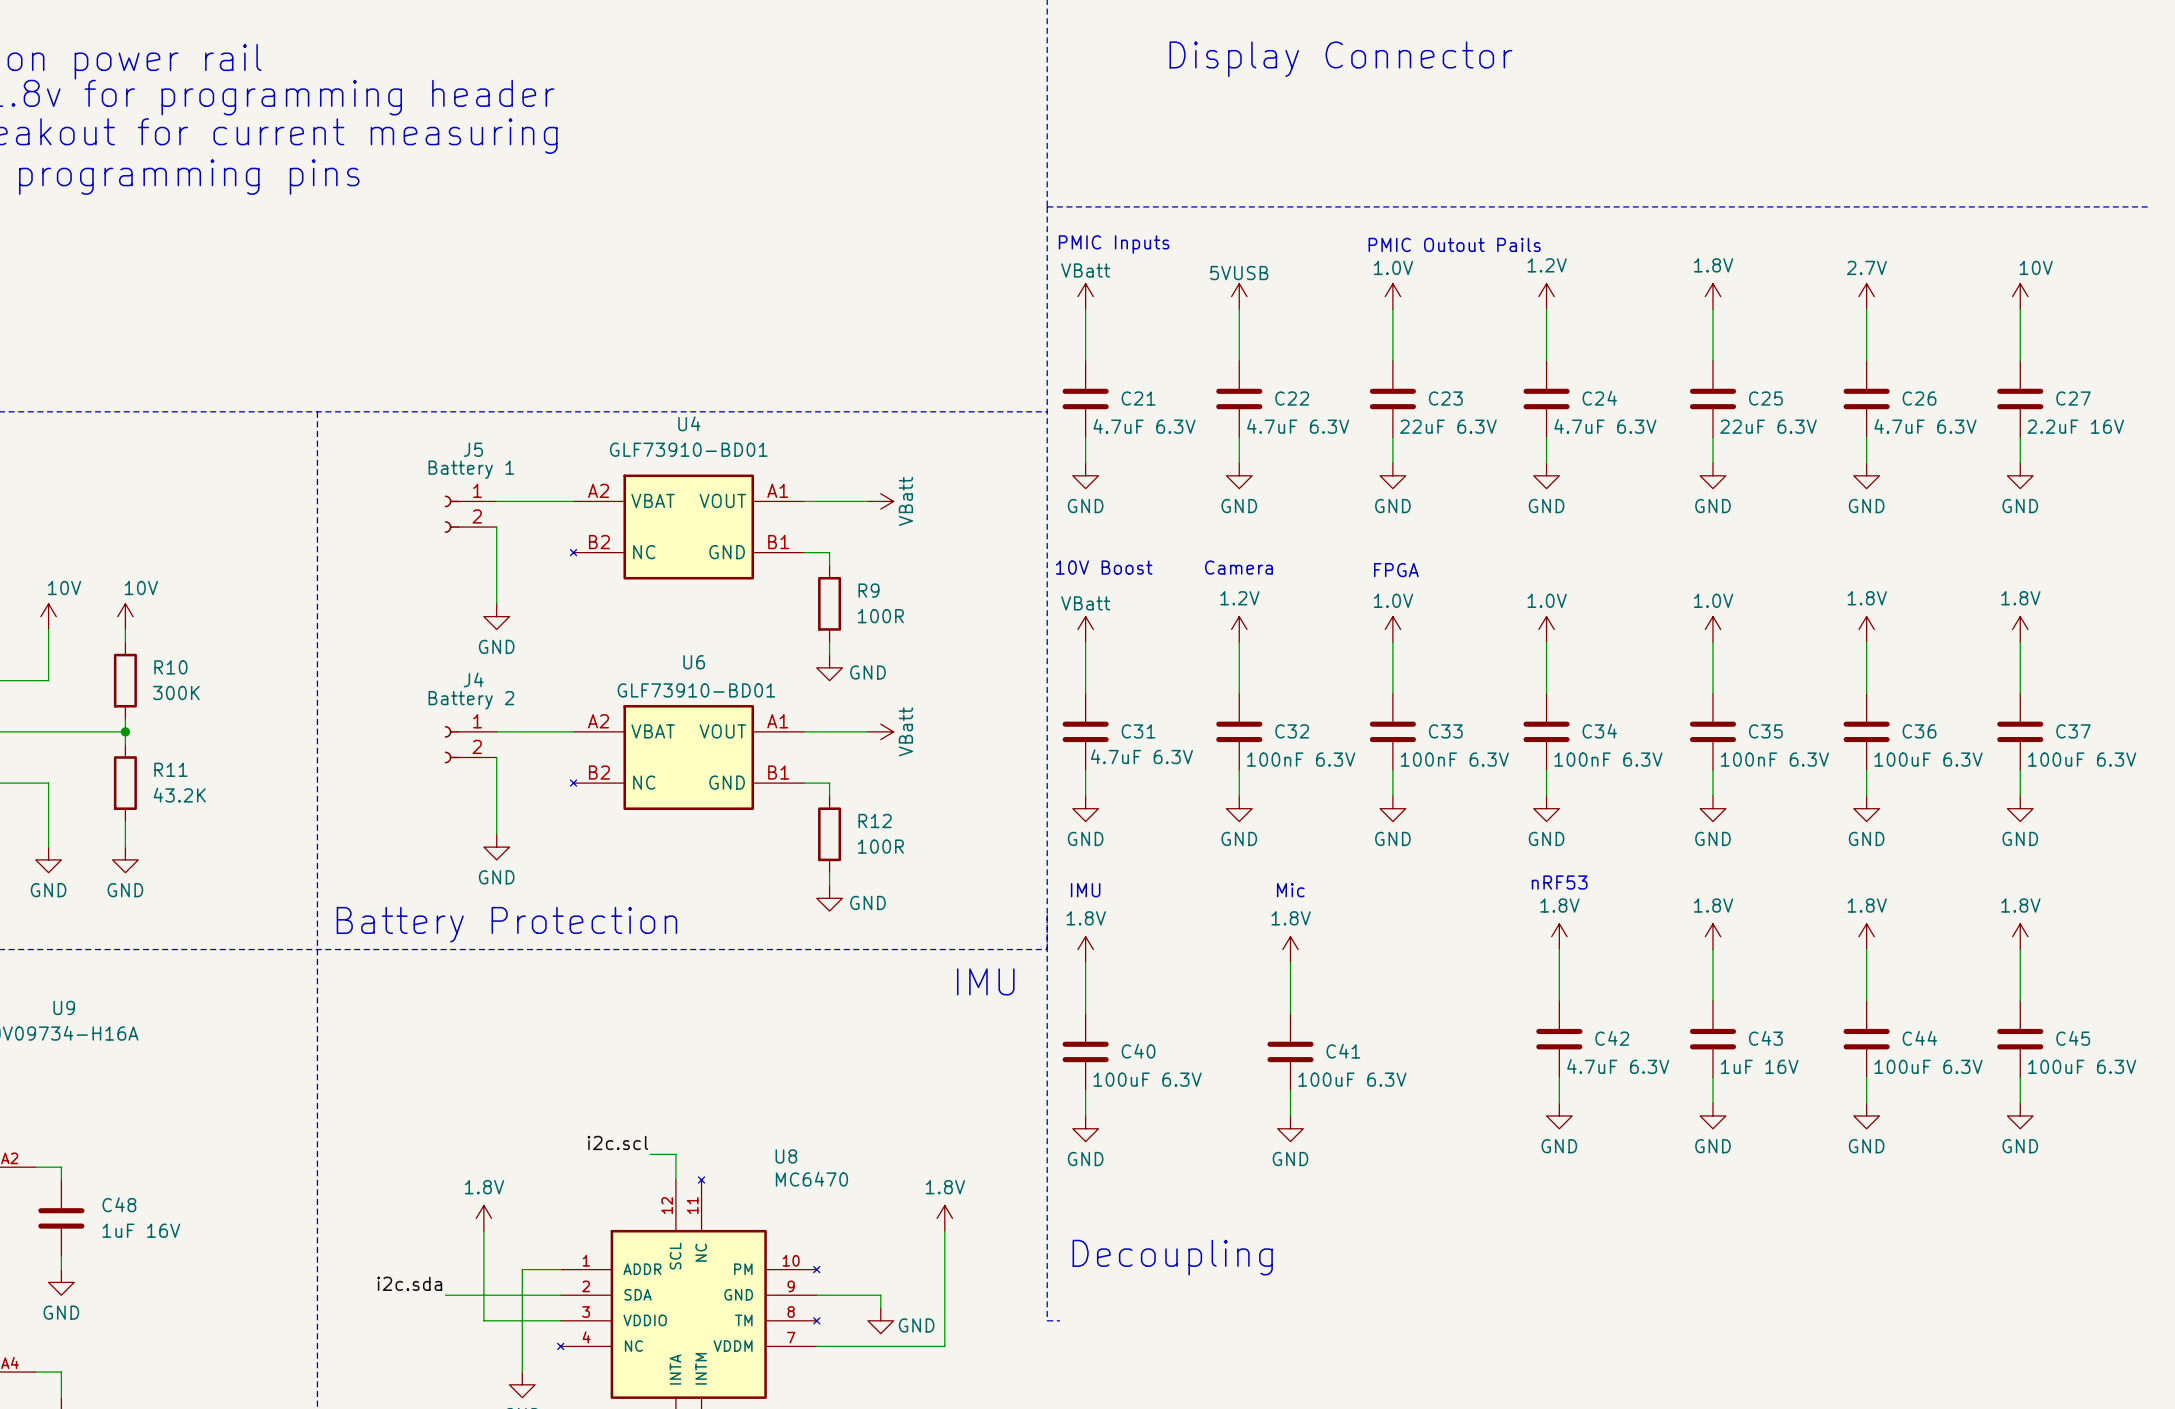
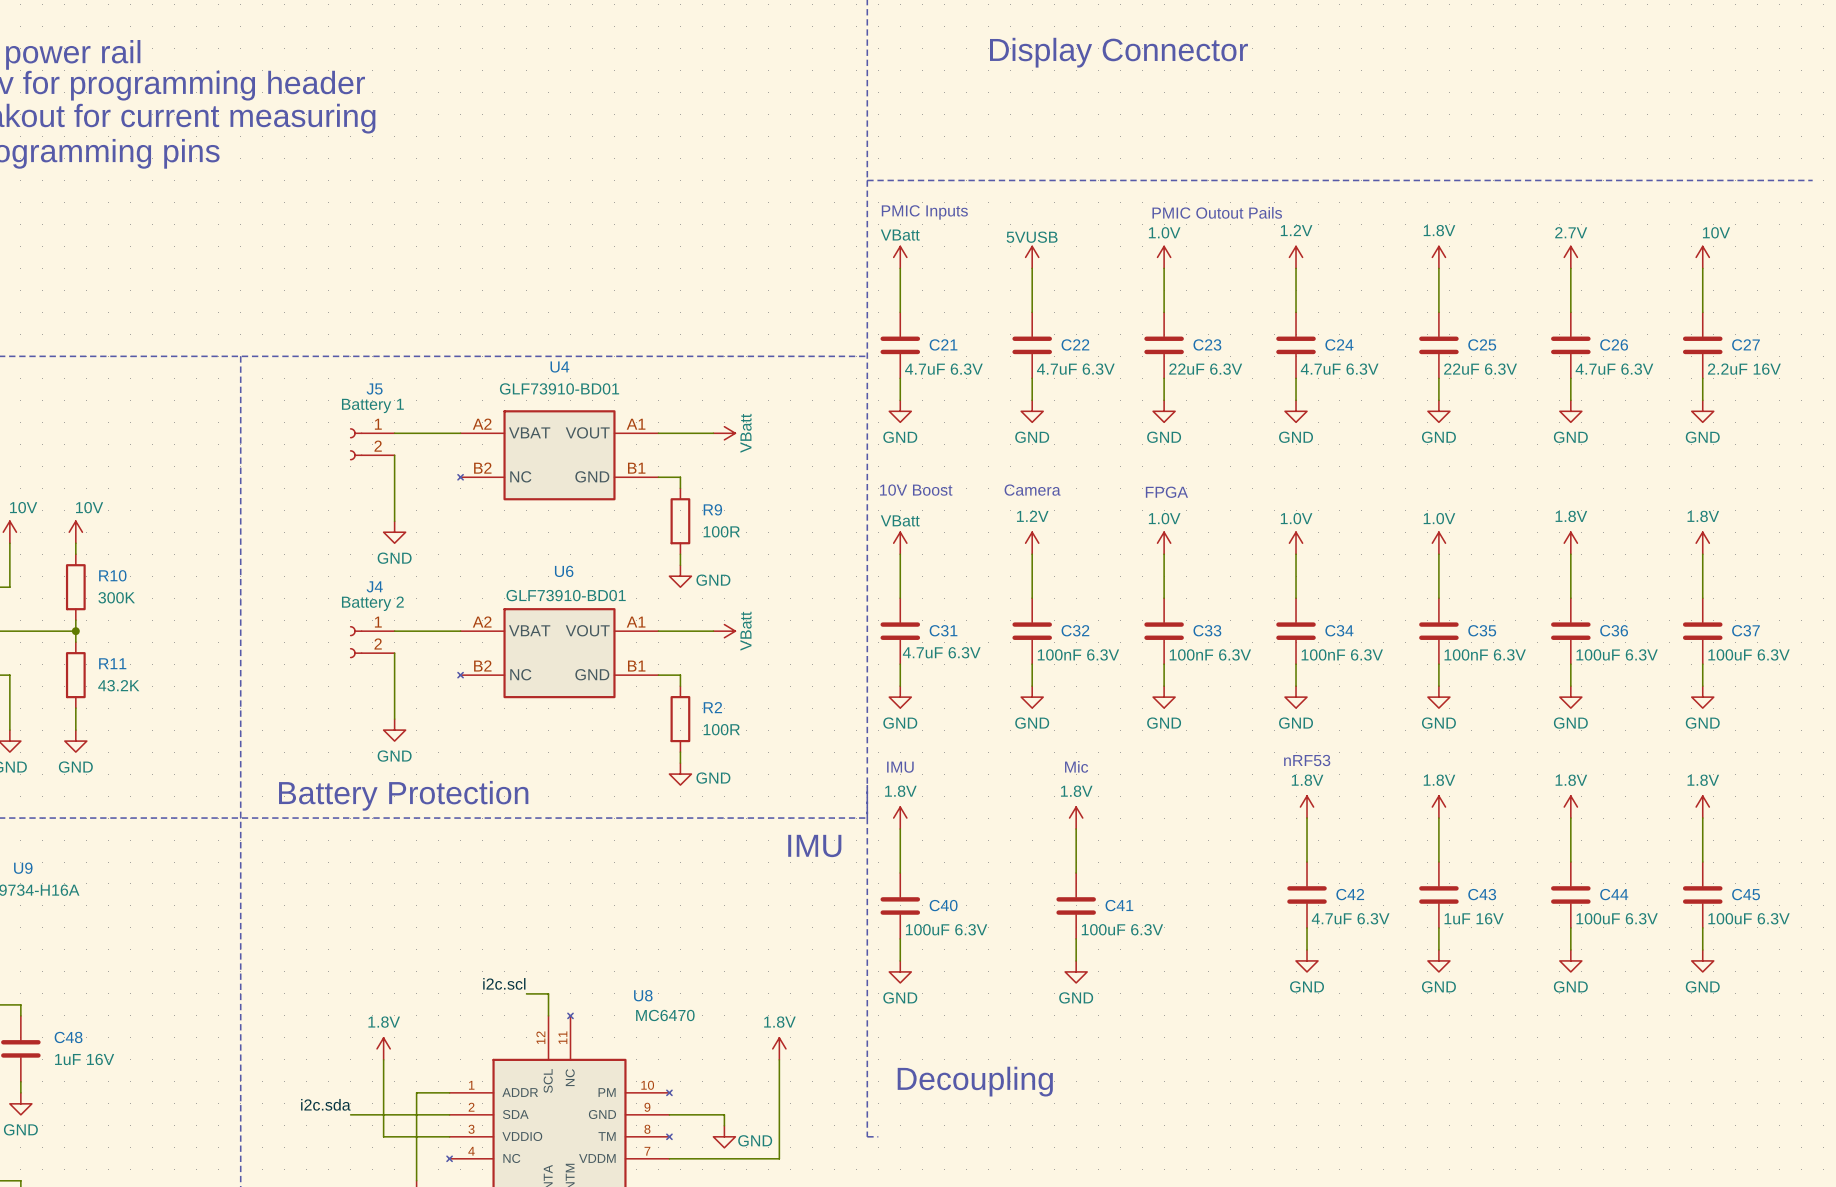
R12 name: R12 (875, 821) -> R2 (712, 707)

